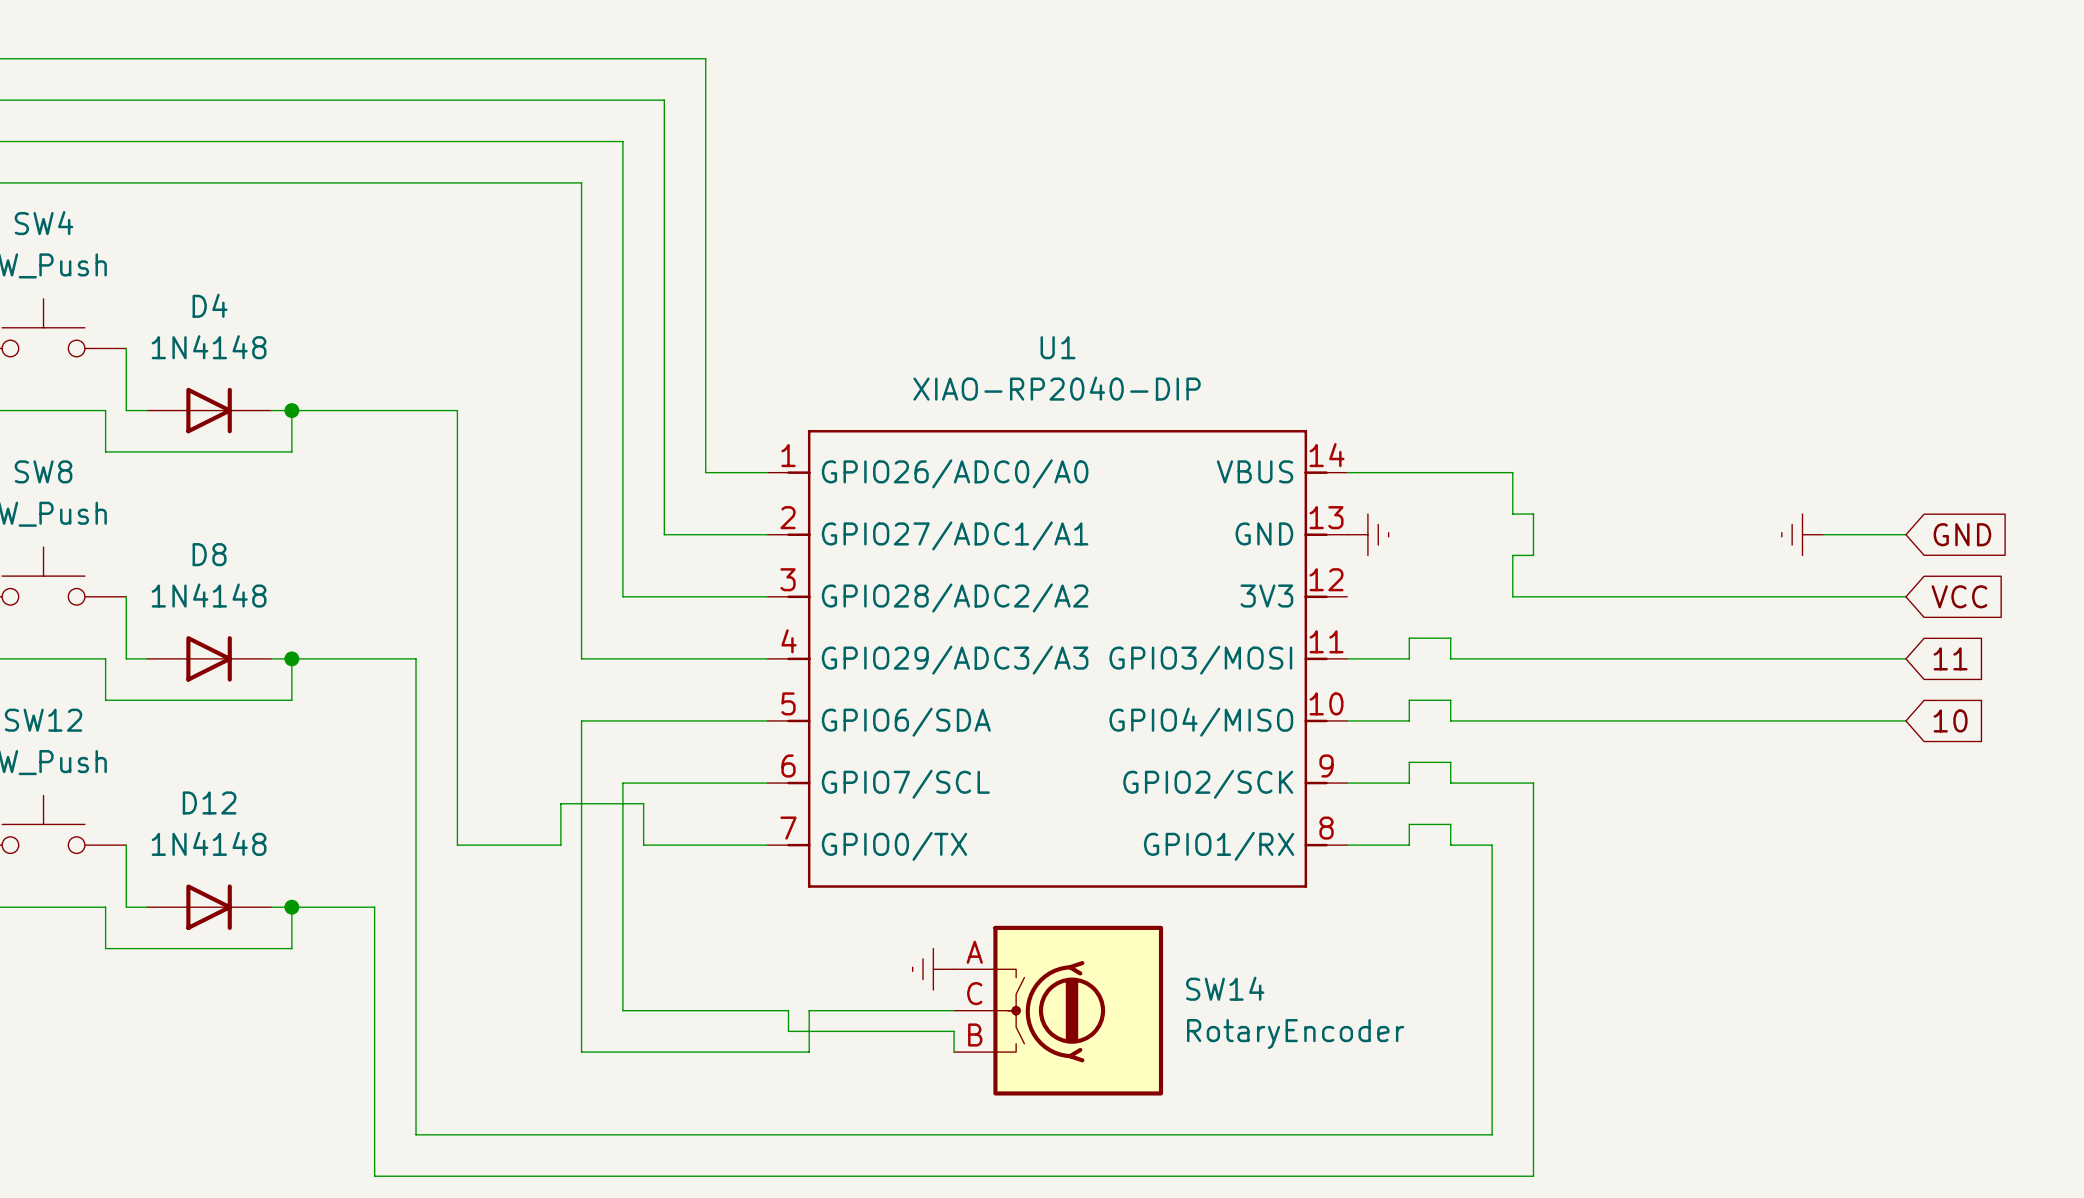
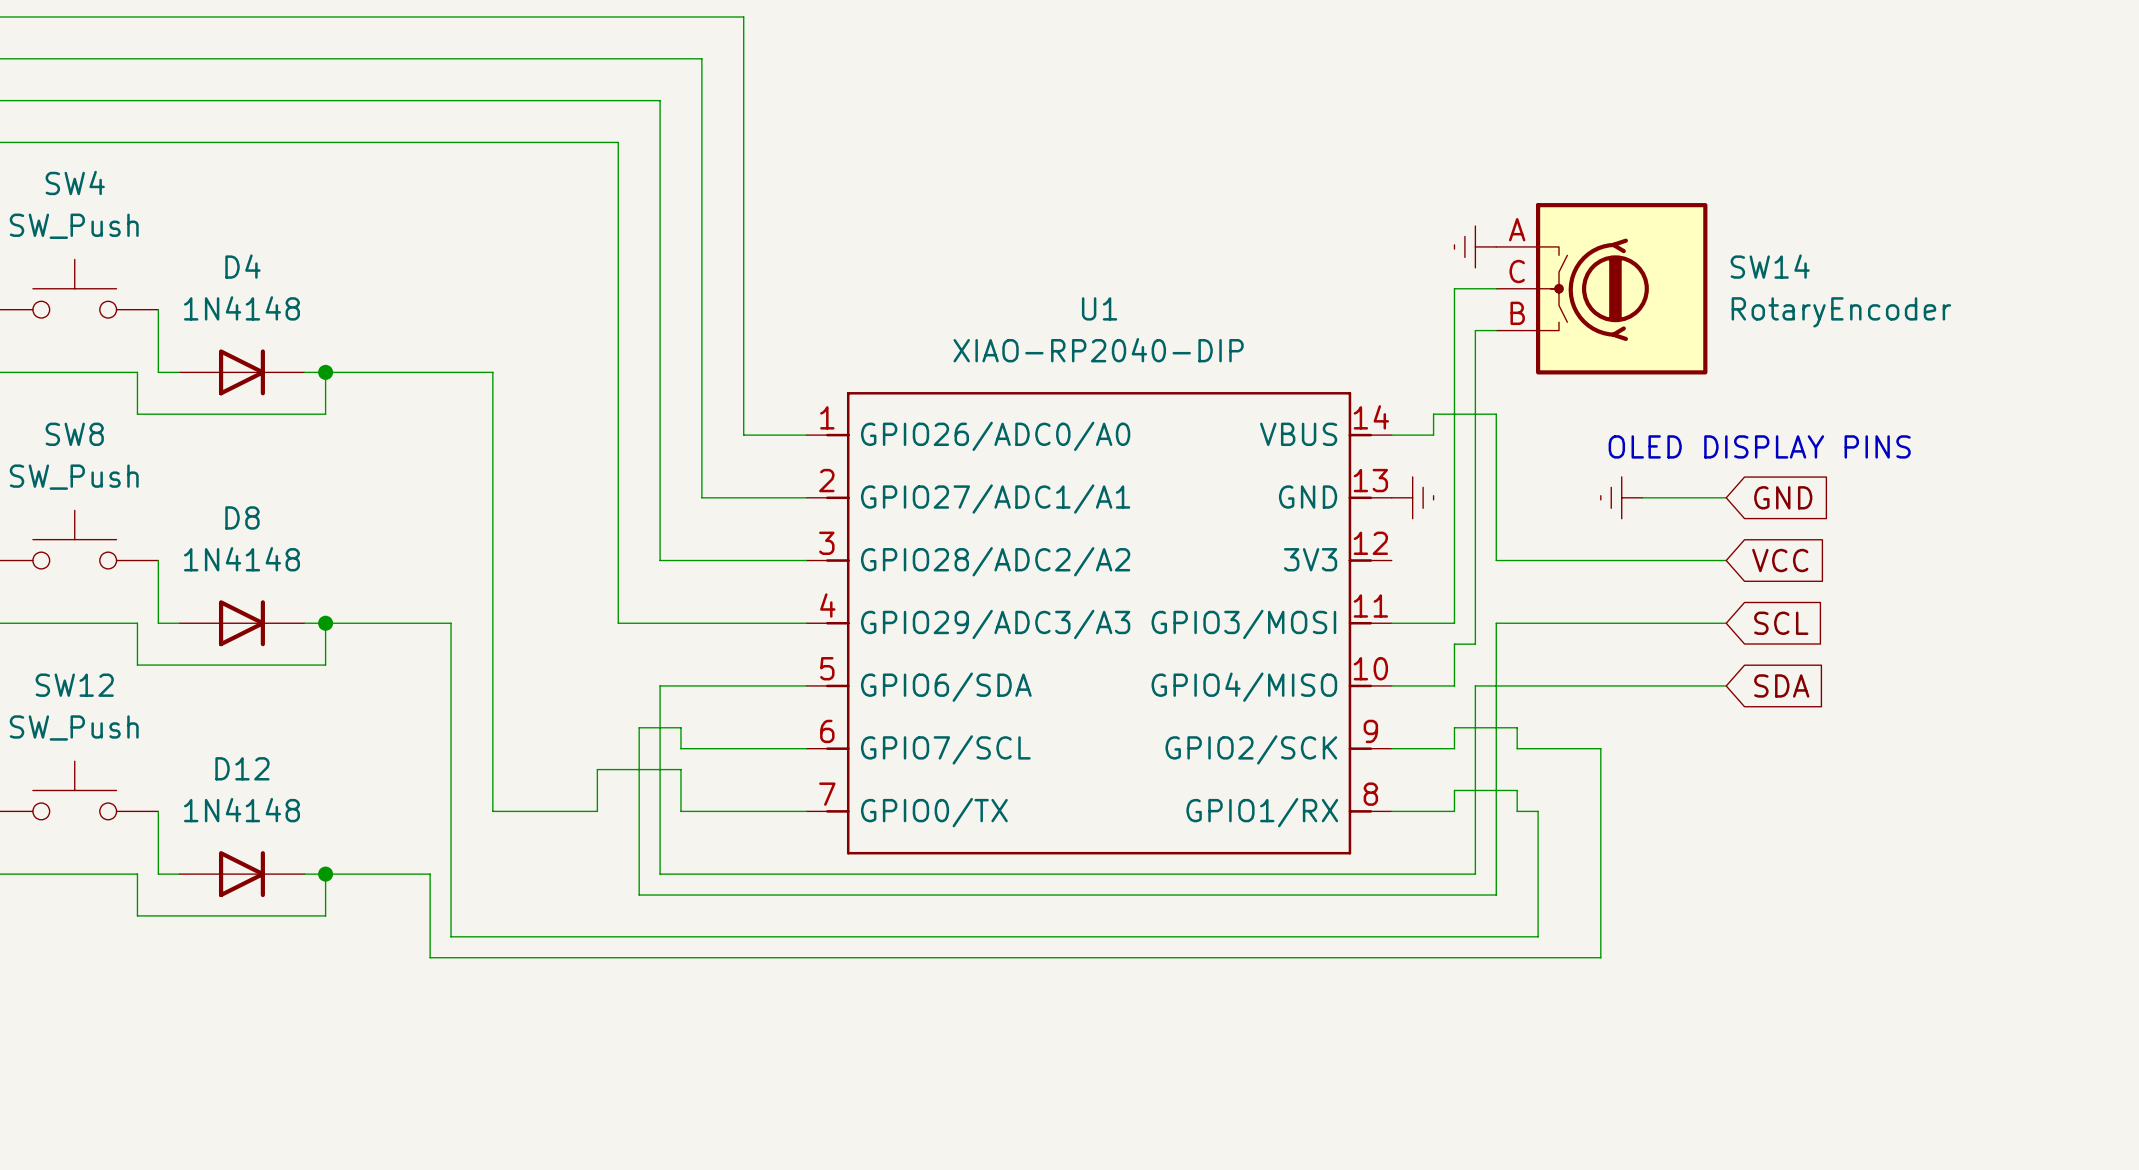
power symbol: none -> (1475, 246)
wire: none -> (1496, 330) (1475, 330) (1475, 644) (1454, 644) (1454, 665)
wire: (1388, 472) (1512, 472) (1512, 514) (1533, 514) (1533, 555) (1512, 555) (1512, 596) -> (1433, 435) (1433, 414) (1496, 414) (1496, 560) (1559, 560)
text: none -> OLED DISPLAY PINS (1759, 446)
power symbol: none -> (1621, 497)
power symbol: (1802, 534) -> none
wire: (1823, 534) (1905, 534) -> (1642, 497) (1726, 497)
global label position: GND (1962, 534) -> GND (1783, 497)
wire: (1678, 596) (1905, 596) -> none
global label position: VCC (1959, 596) -> VCC (1780, 560)
wire: (1409, 638) (1450, 638) (1450, 658) -> (1454, 602) (1454, 288) (1496, 288)
wire: (1678, 658) (1905, 658) -> none
global label: none -> SCL (1781, 623)
global label: 11 (1950, 658) -> none
wire: (1409, 700) (1450, 700) -> (1496, 623) (1496, 665)
wire: (622, 720) (581, 720) (581, 1052) (809, 1052) (809, 1010) (954, 1010) -> none
wire: (1678, 720) (1905, 720) -> none
global label: none -> SDA (1781, 685)
global label: 10 (1950, 720) -> none
wire: (622, 783) (643, 783) -> (660, 748) (660, 685)
wire: (1450, 783) (1471, 783) -> (1496, 748) (1496, 790) (1517, 790) (1517, 811)
wire: (1533, 783) (1533, 1176) (374, 1176) (374, 907) -> (1579, 748) (1600, 748) (1600, 957) (430, 957) (430, 874) (409, 874)
wire: (1450, 845) (1471, 845) -> (1496, 811) (1496, 895) (639, 895) (639, 727) (680, 727) (680, 748)
wire: (622, 907) (622, 1010) (788, 1010) (788, 1031) (954, 1031) (954, 1052) -> (660, 874) (1475, 874) (1475, 685) (1496, 685) (1496, 727) (1517, 727) (1517, 748)
wire: (416, 969) (416, 1134) (1492, 1134) (1492, 969) -> (451, 936) (1538, 936)
power symbol: (933, 969) -> none
SW14 position: (1058, 1010) -> (1601, 288)

